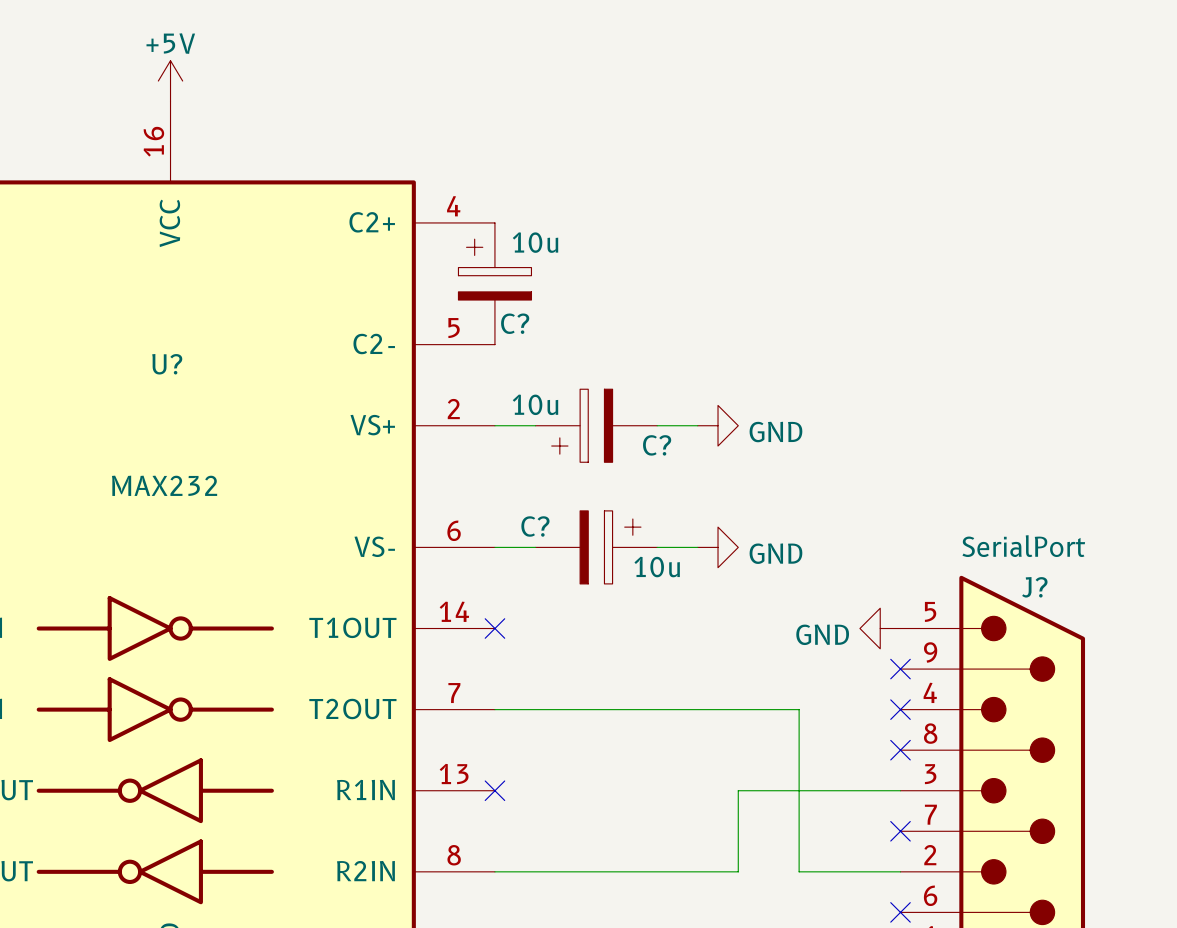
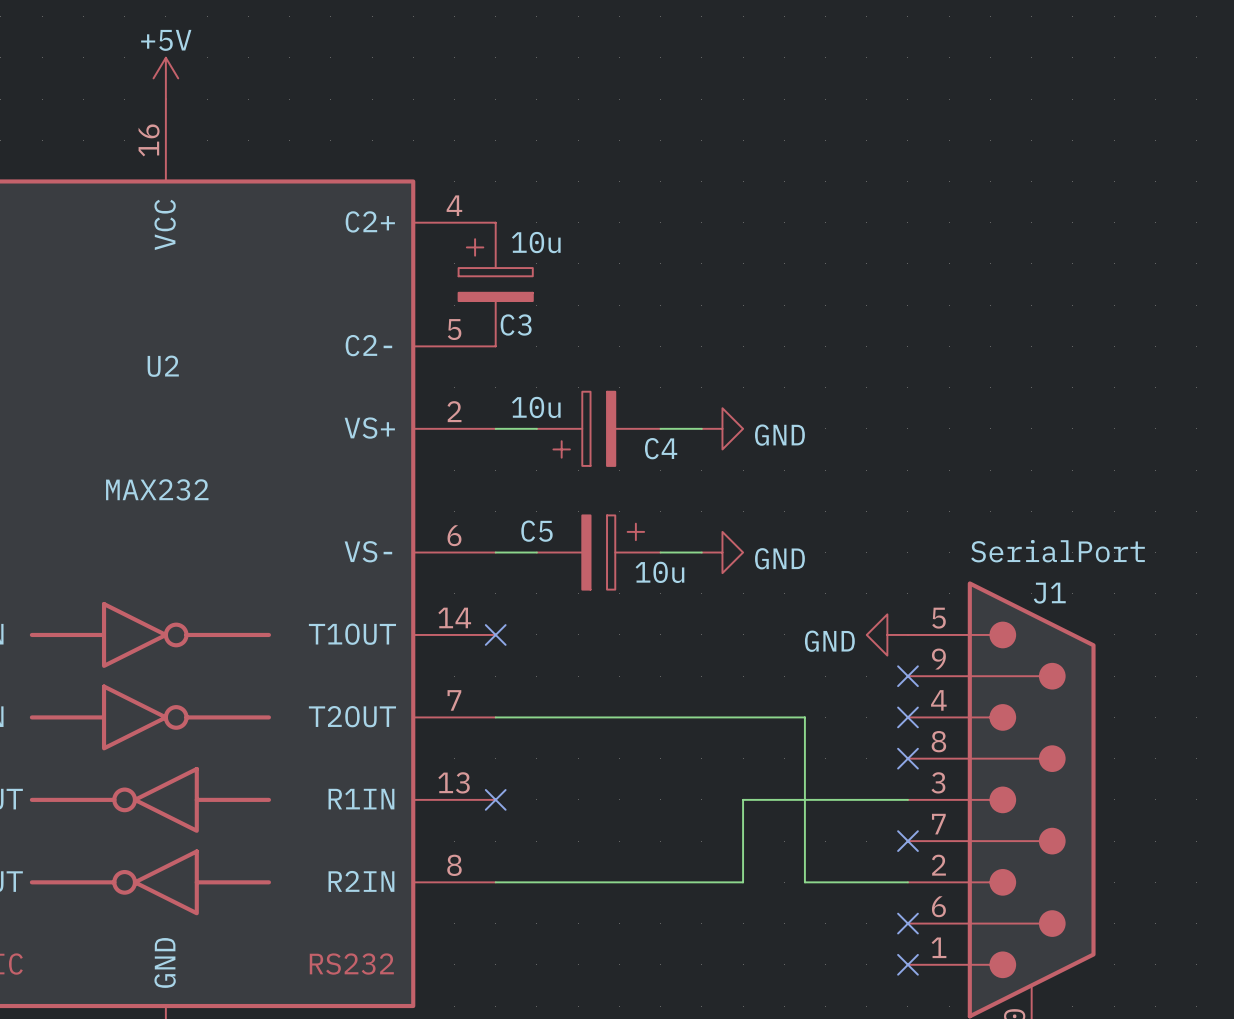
C? name: C? (515, 323) -> C3 (516, 324)
U? name: U? (167, 364) -> U2 (163, 366)
C? name: C? (657, 445) -> C4 (661, 448)
C? name: C? (535, 526) -> C5 (536, 531)
J? name: J? (1034, 587) -> J1 (1049, 593)

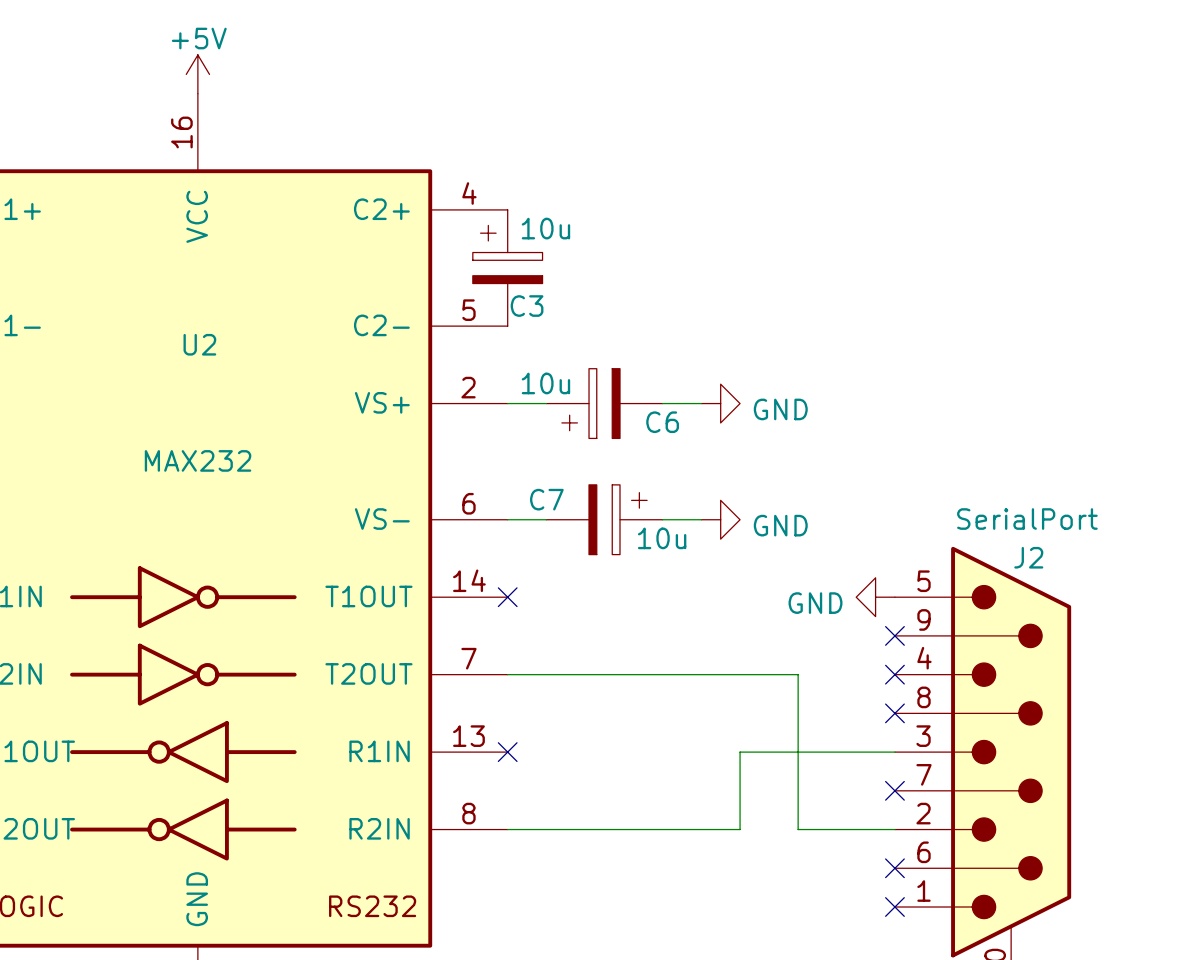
C4 name: C4 (661, 448) -> C6 (662, 422)
C5 name: C5 (536, 531) -> C7 (546, 499)
J1 name: J1 (1049, 593) -> J2 (1028, 557)

